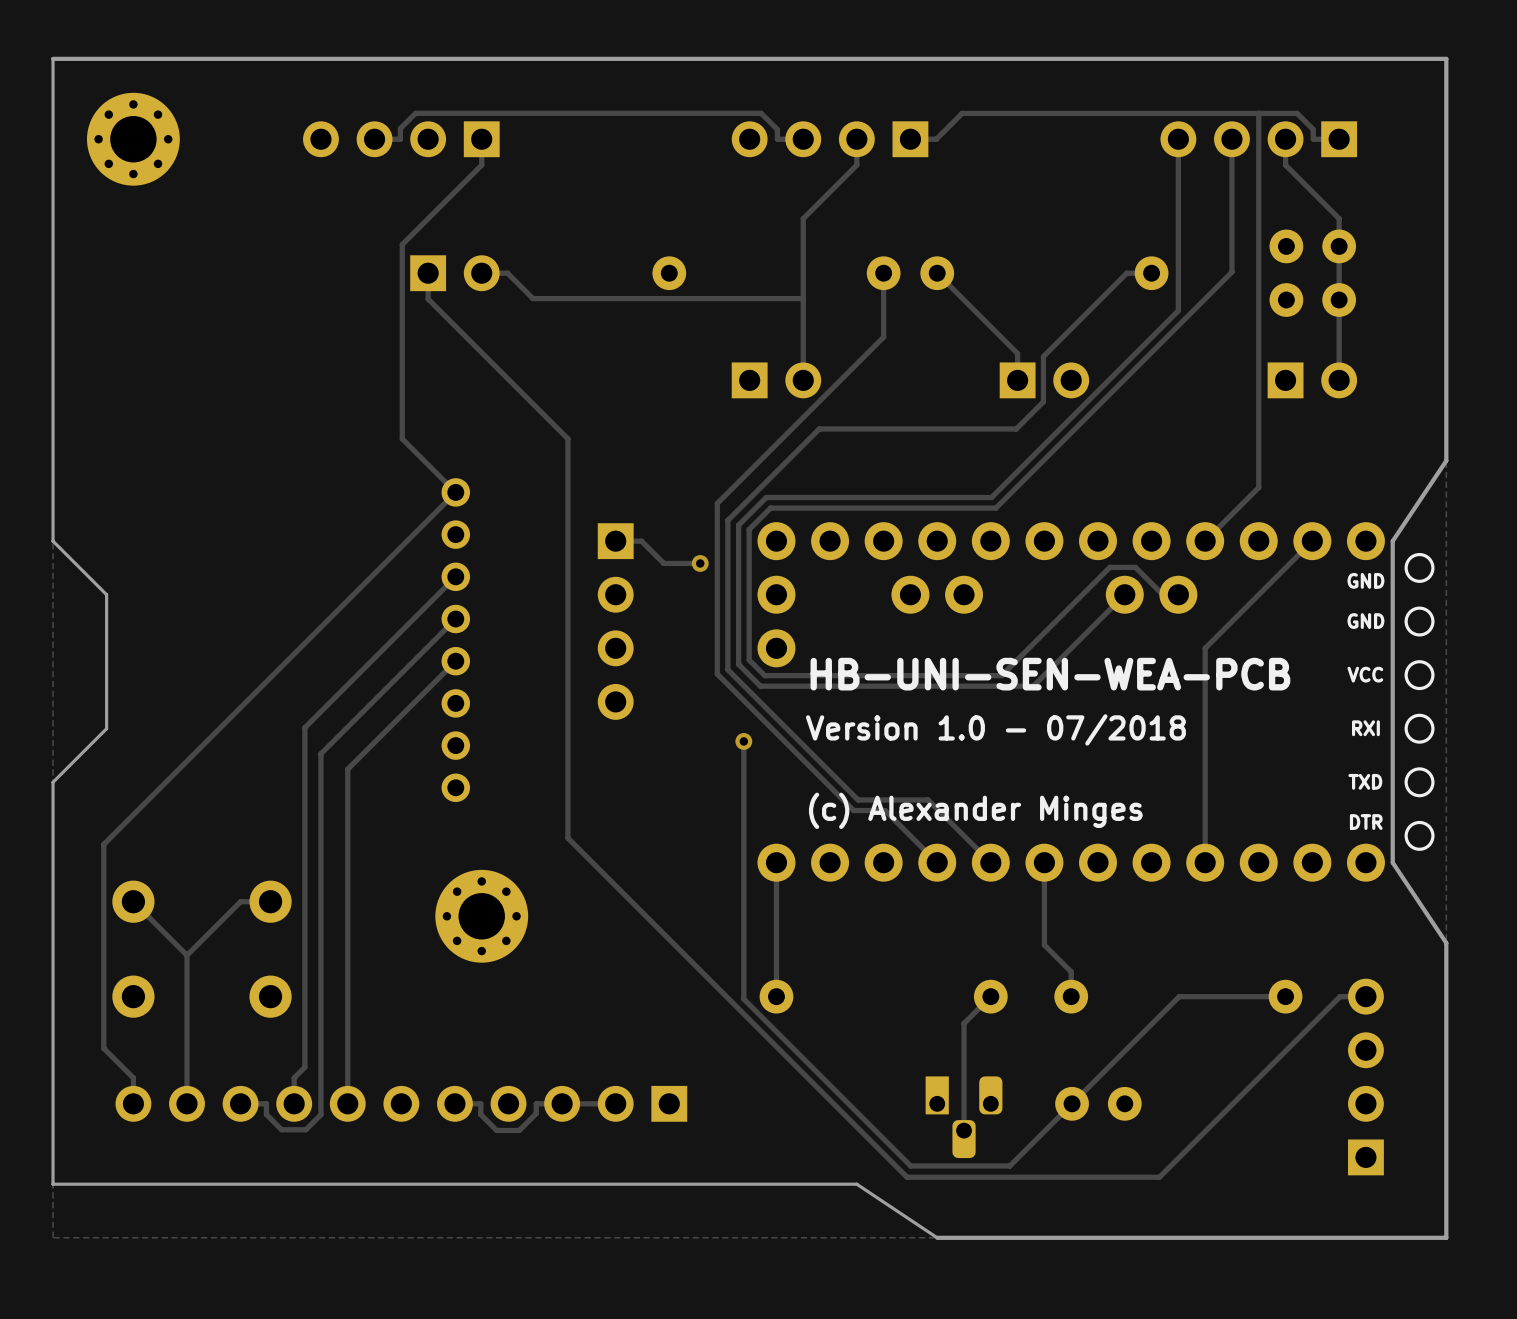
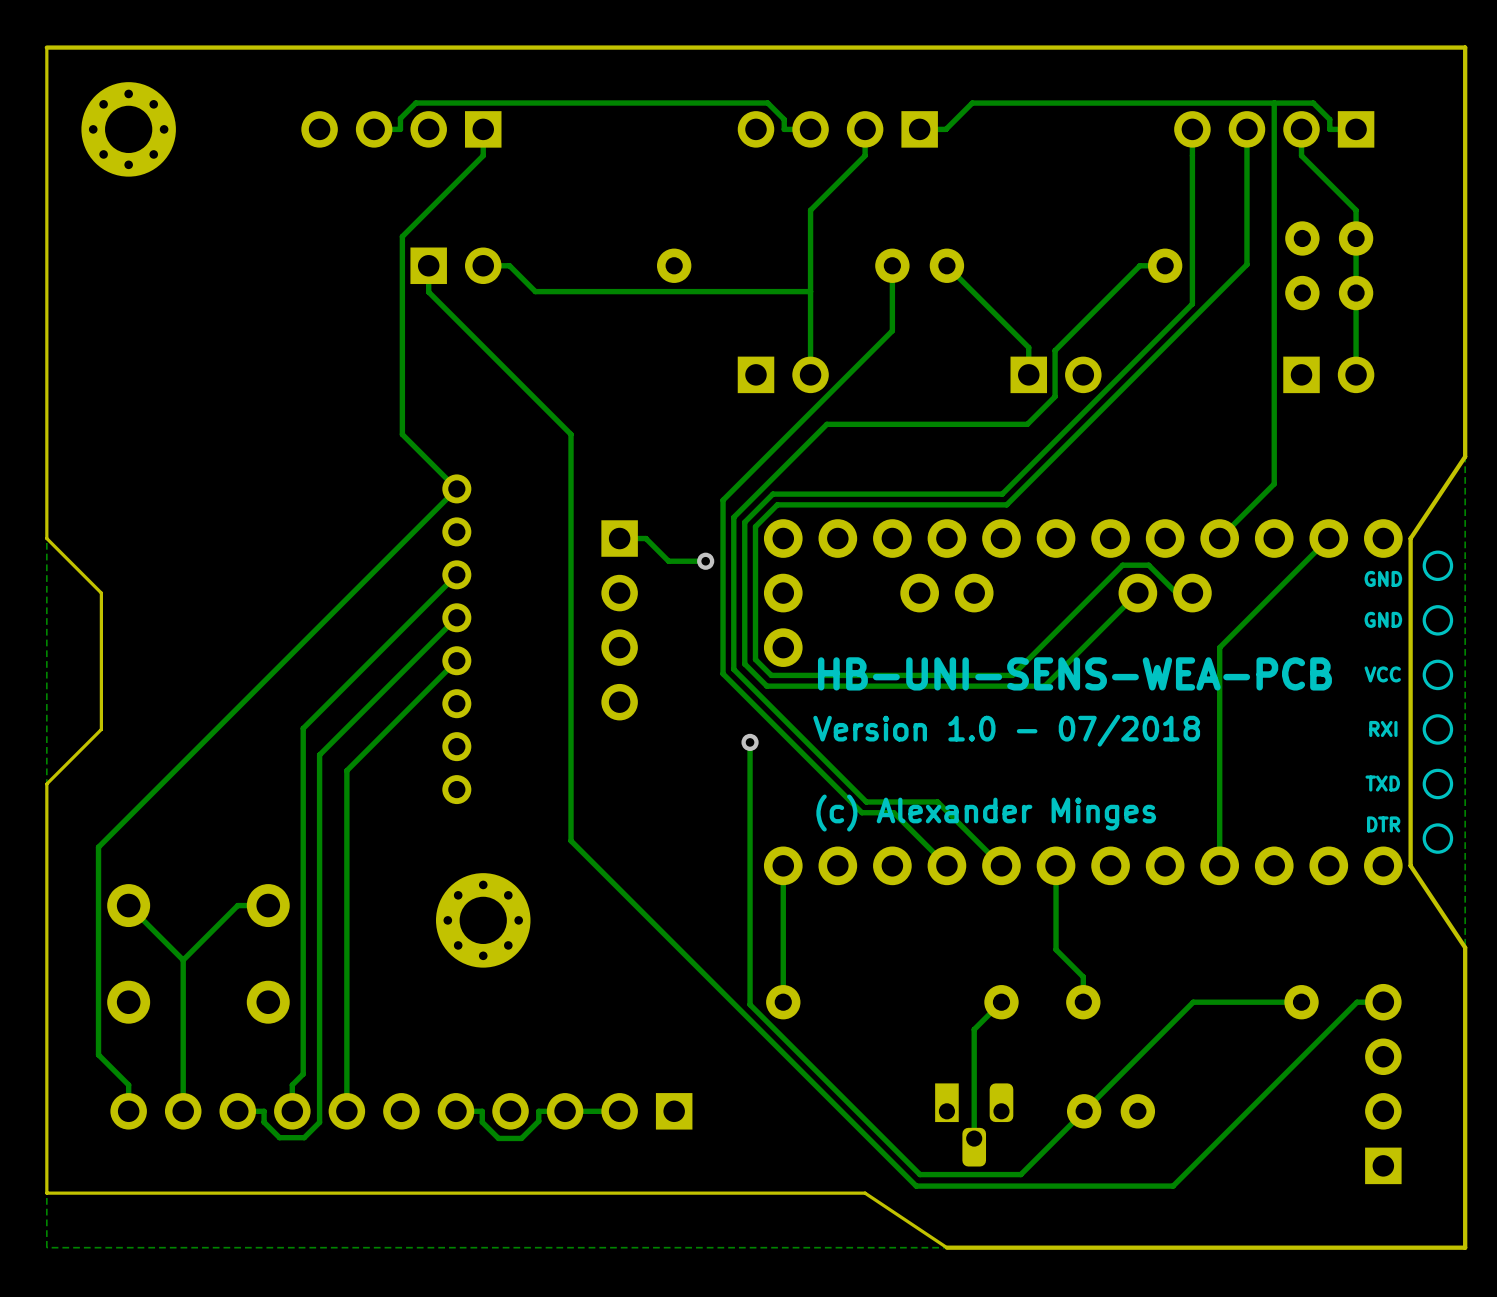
text: HB-UNI-SEN-WEA-PCB (1050, 674) -> HB-UNI-SENS-WEA-PCB (1074, 673)

